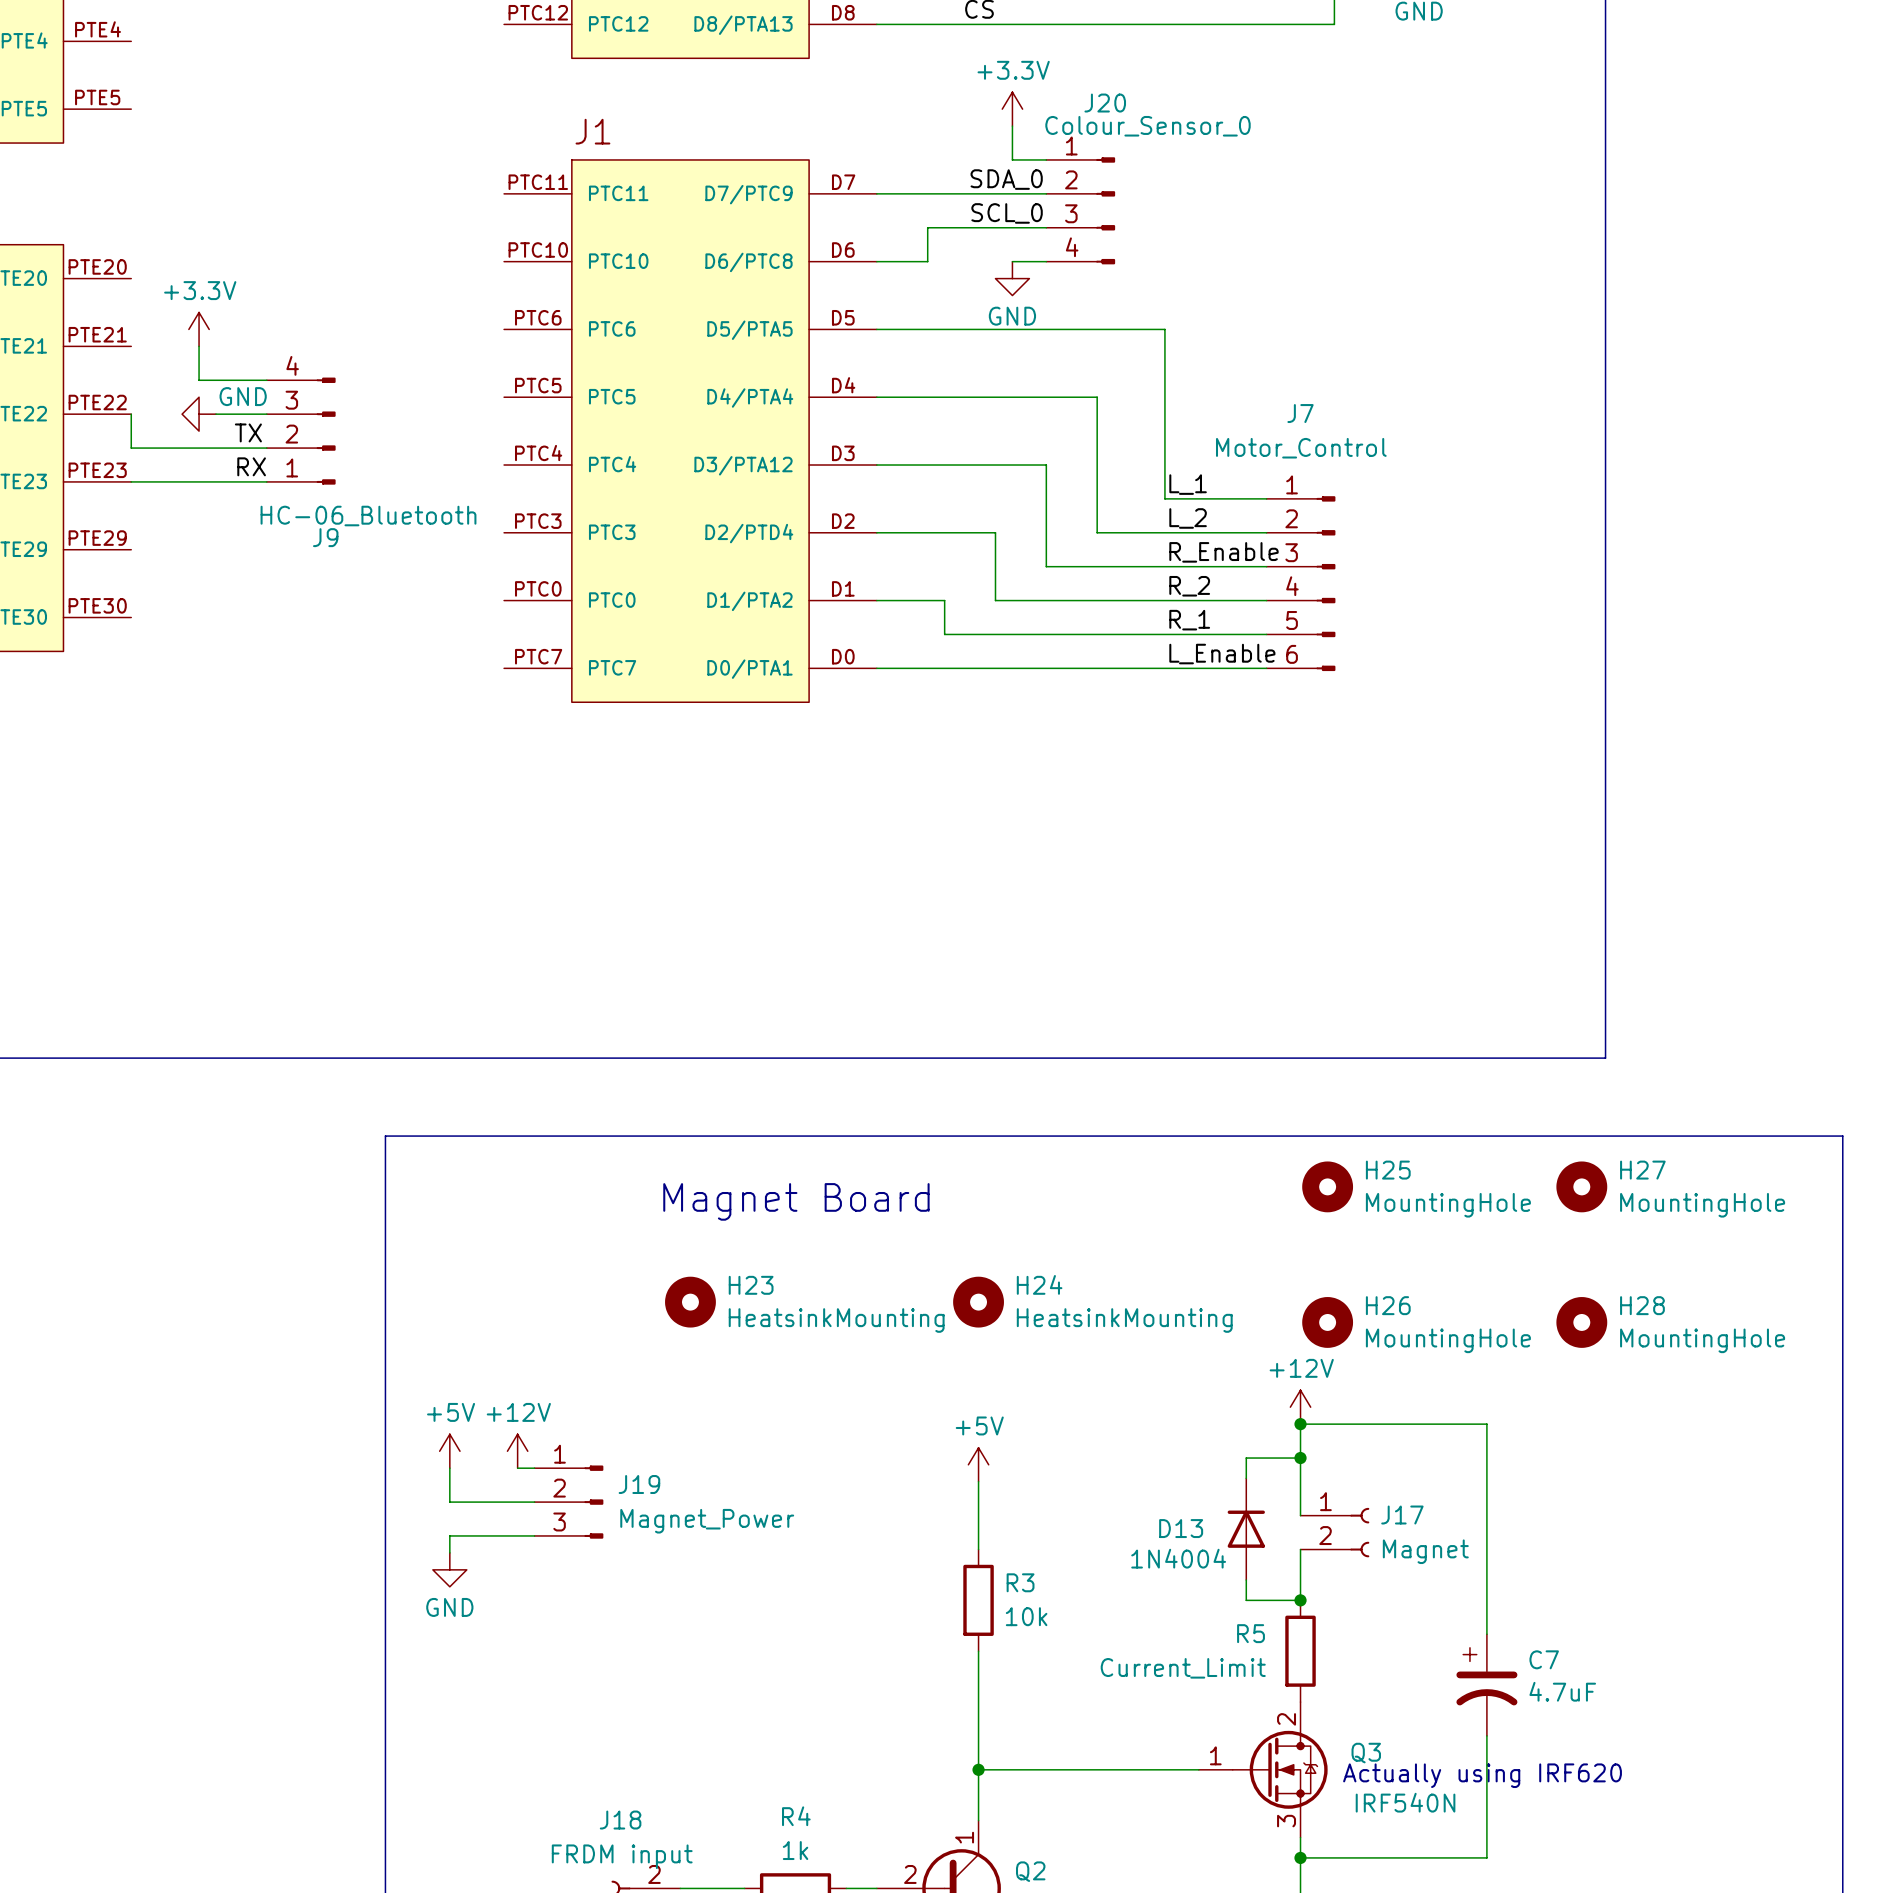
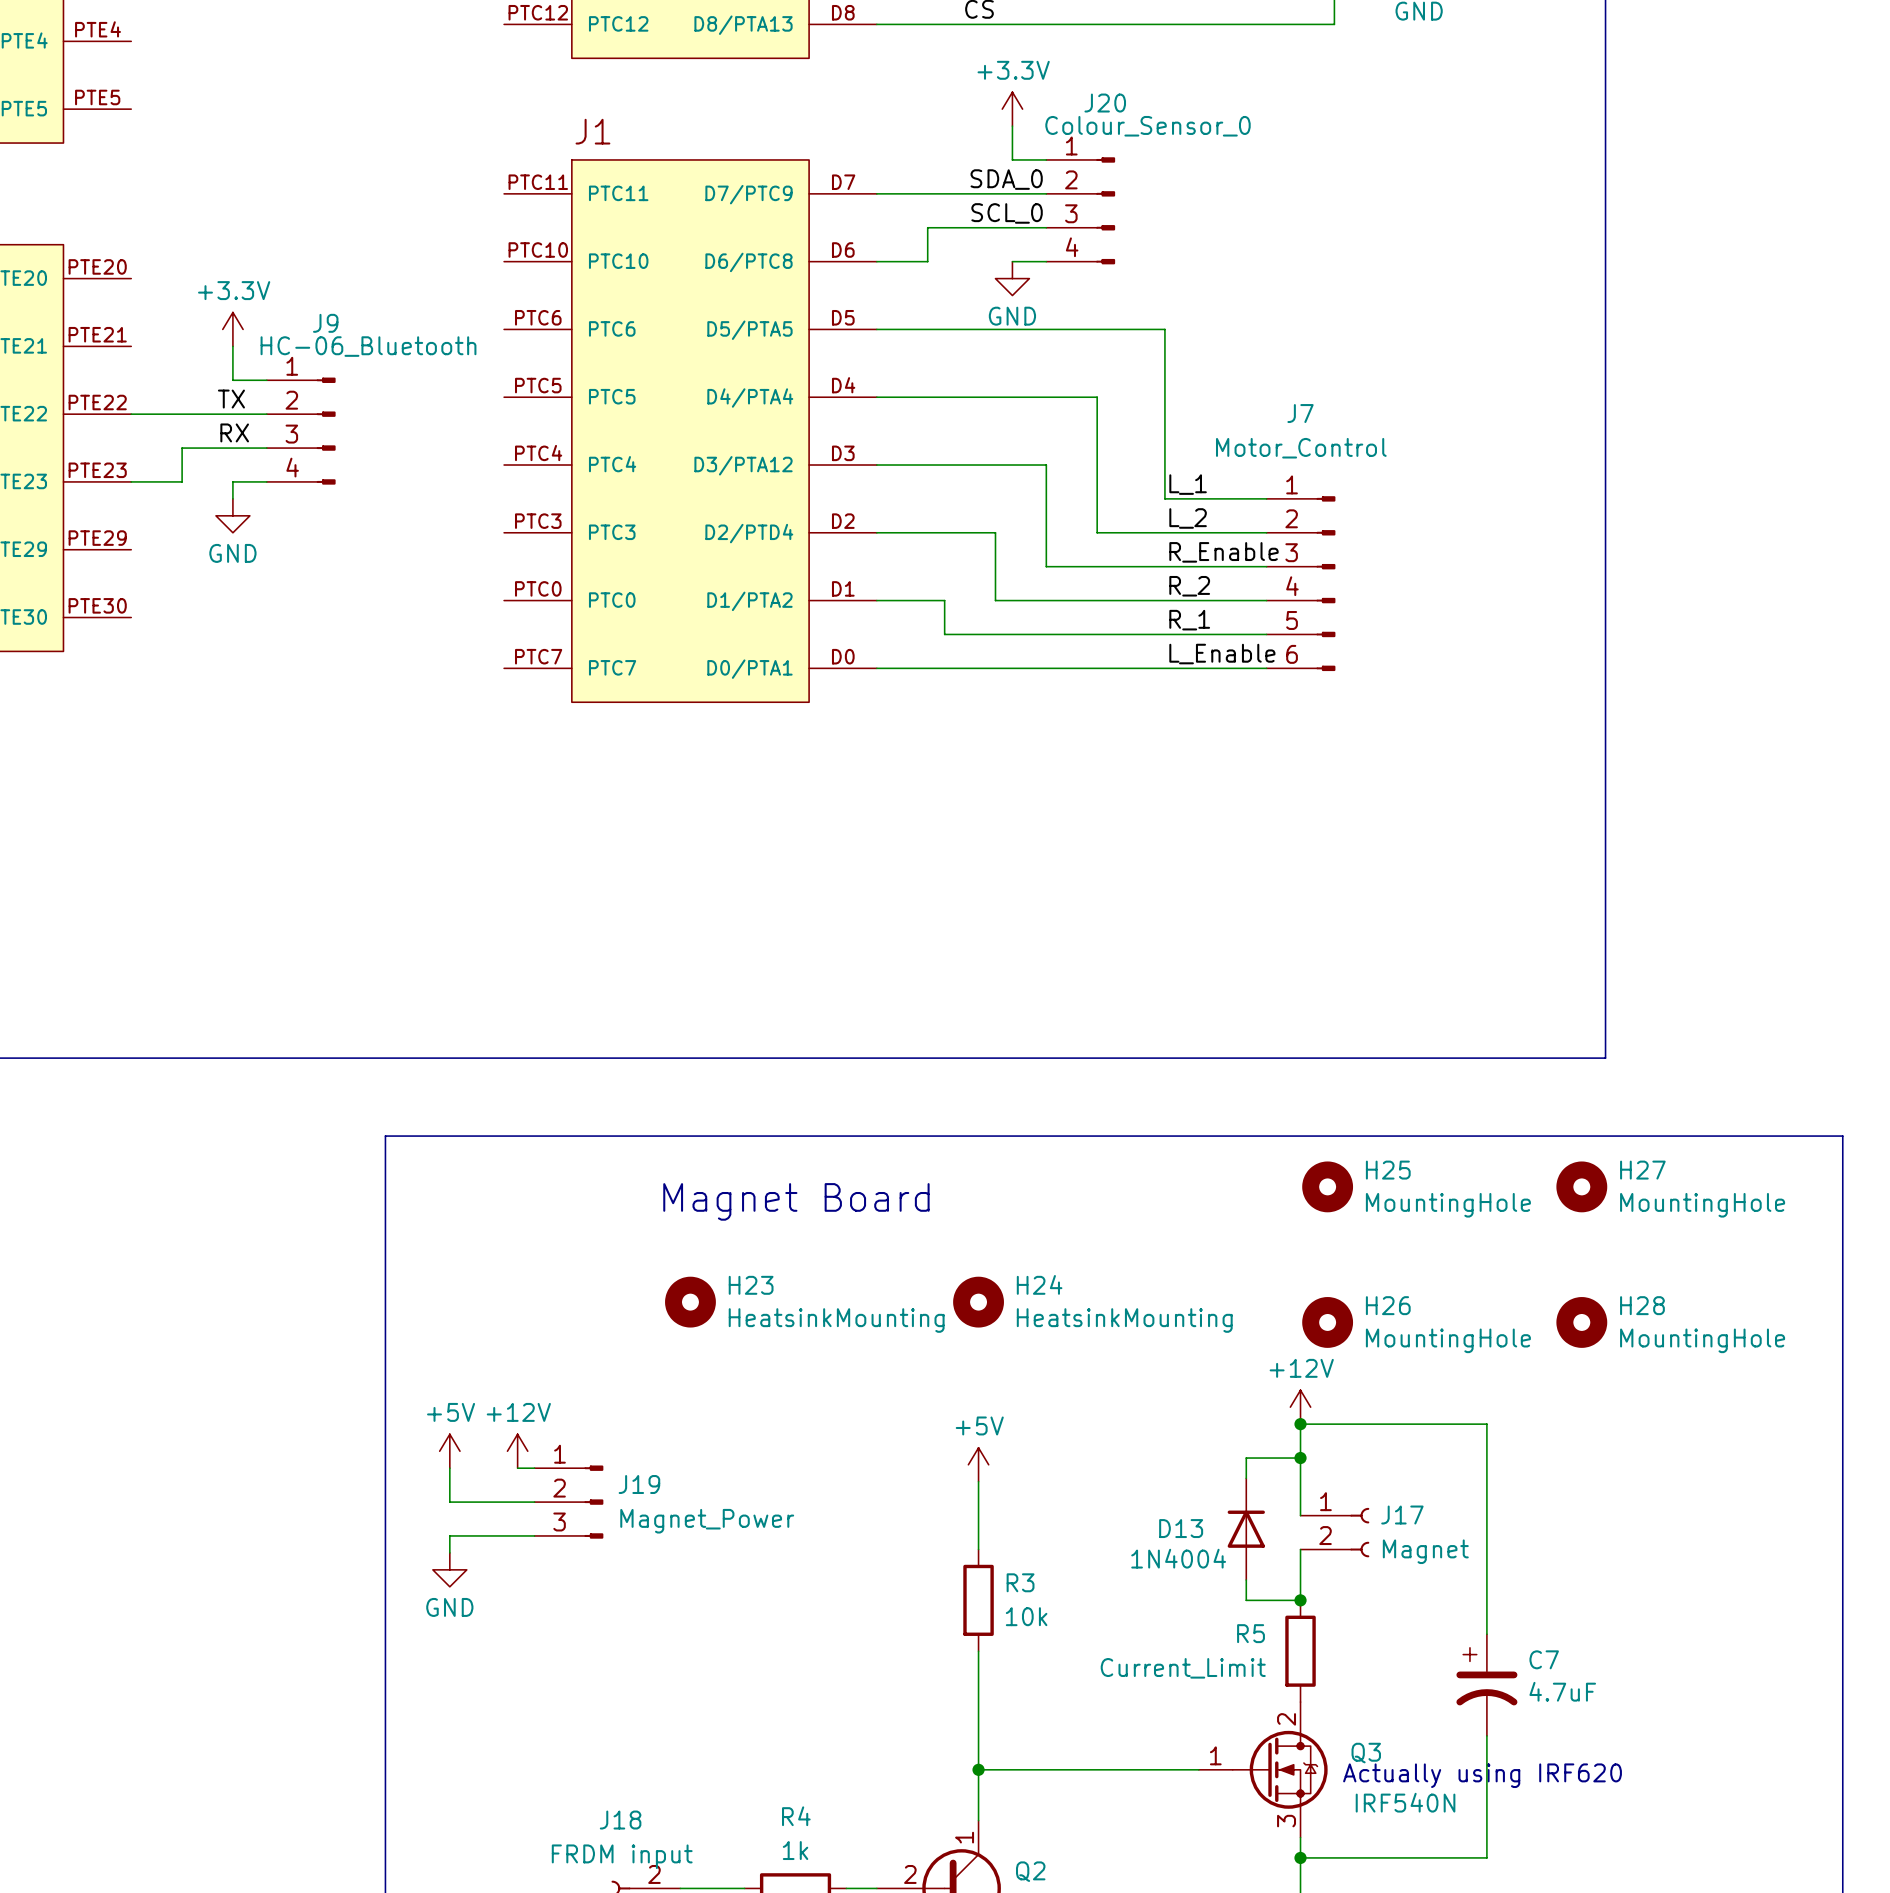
power symbol position: +3.3V (199, 329) -> +3.3V (232, 329)
wire: (199, 346) (199, 380) (232, 380) -> (232, 346) (232, 380)
power symbol text position: GND (243, 396) -> GND (232, 553)
wire: (131, 414) (131, 448) (182, 448) -> (131, 414) (215, 414)
power symbol rotation: 0° (199, 414) -> 90° counterclockwise (232, 515)
power symbol position: GND (199, 414) -> GND (232, 515)
J9 flip: as is (326, 431) -> up-down (326, 431)
label position: TX (248, 432) -> TX (231, 399)
wire: none -> (182, 448) (182, 481)
label position: RX (251, 466) -> RX (234, 432)
wire: (182, 481) (232, 481) -> (232, 498) (232, 481)

